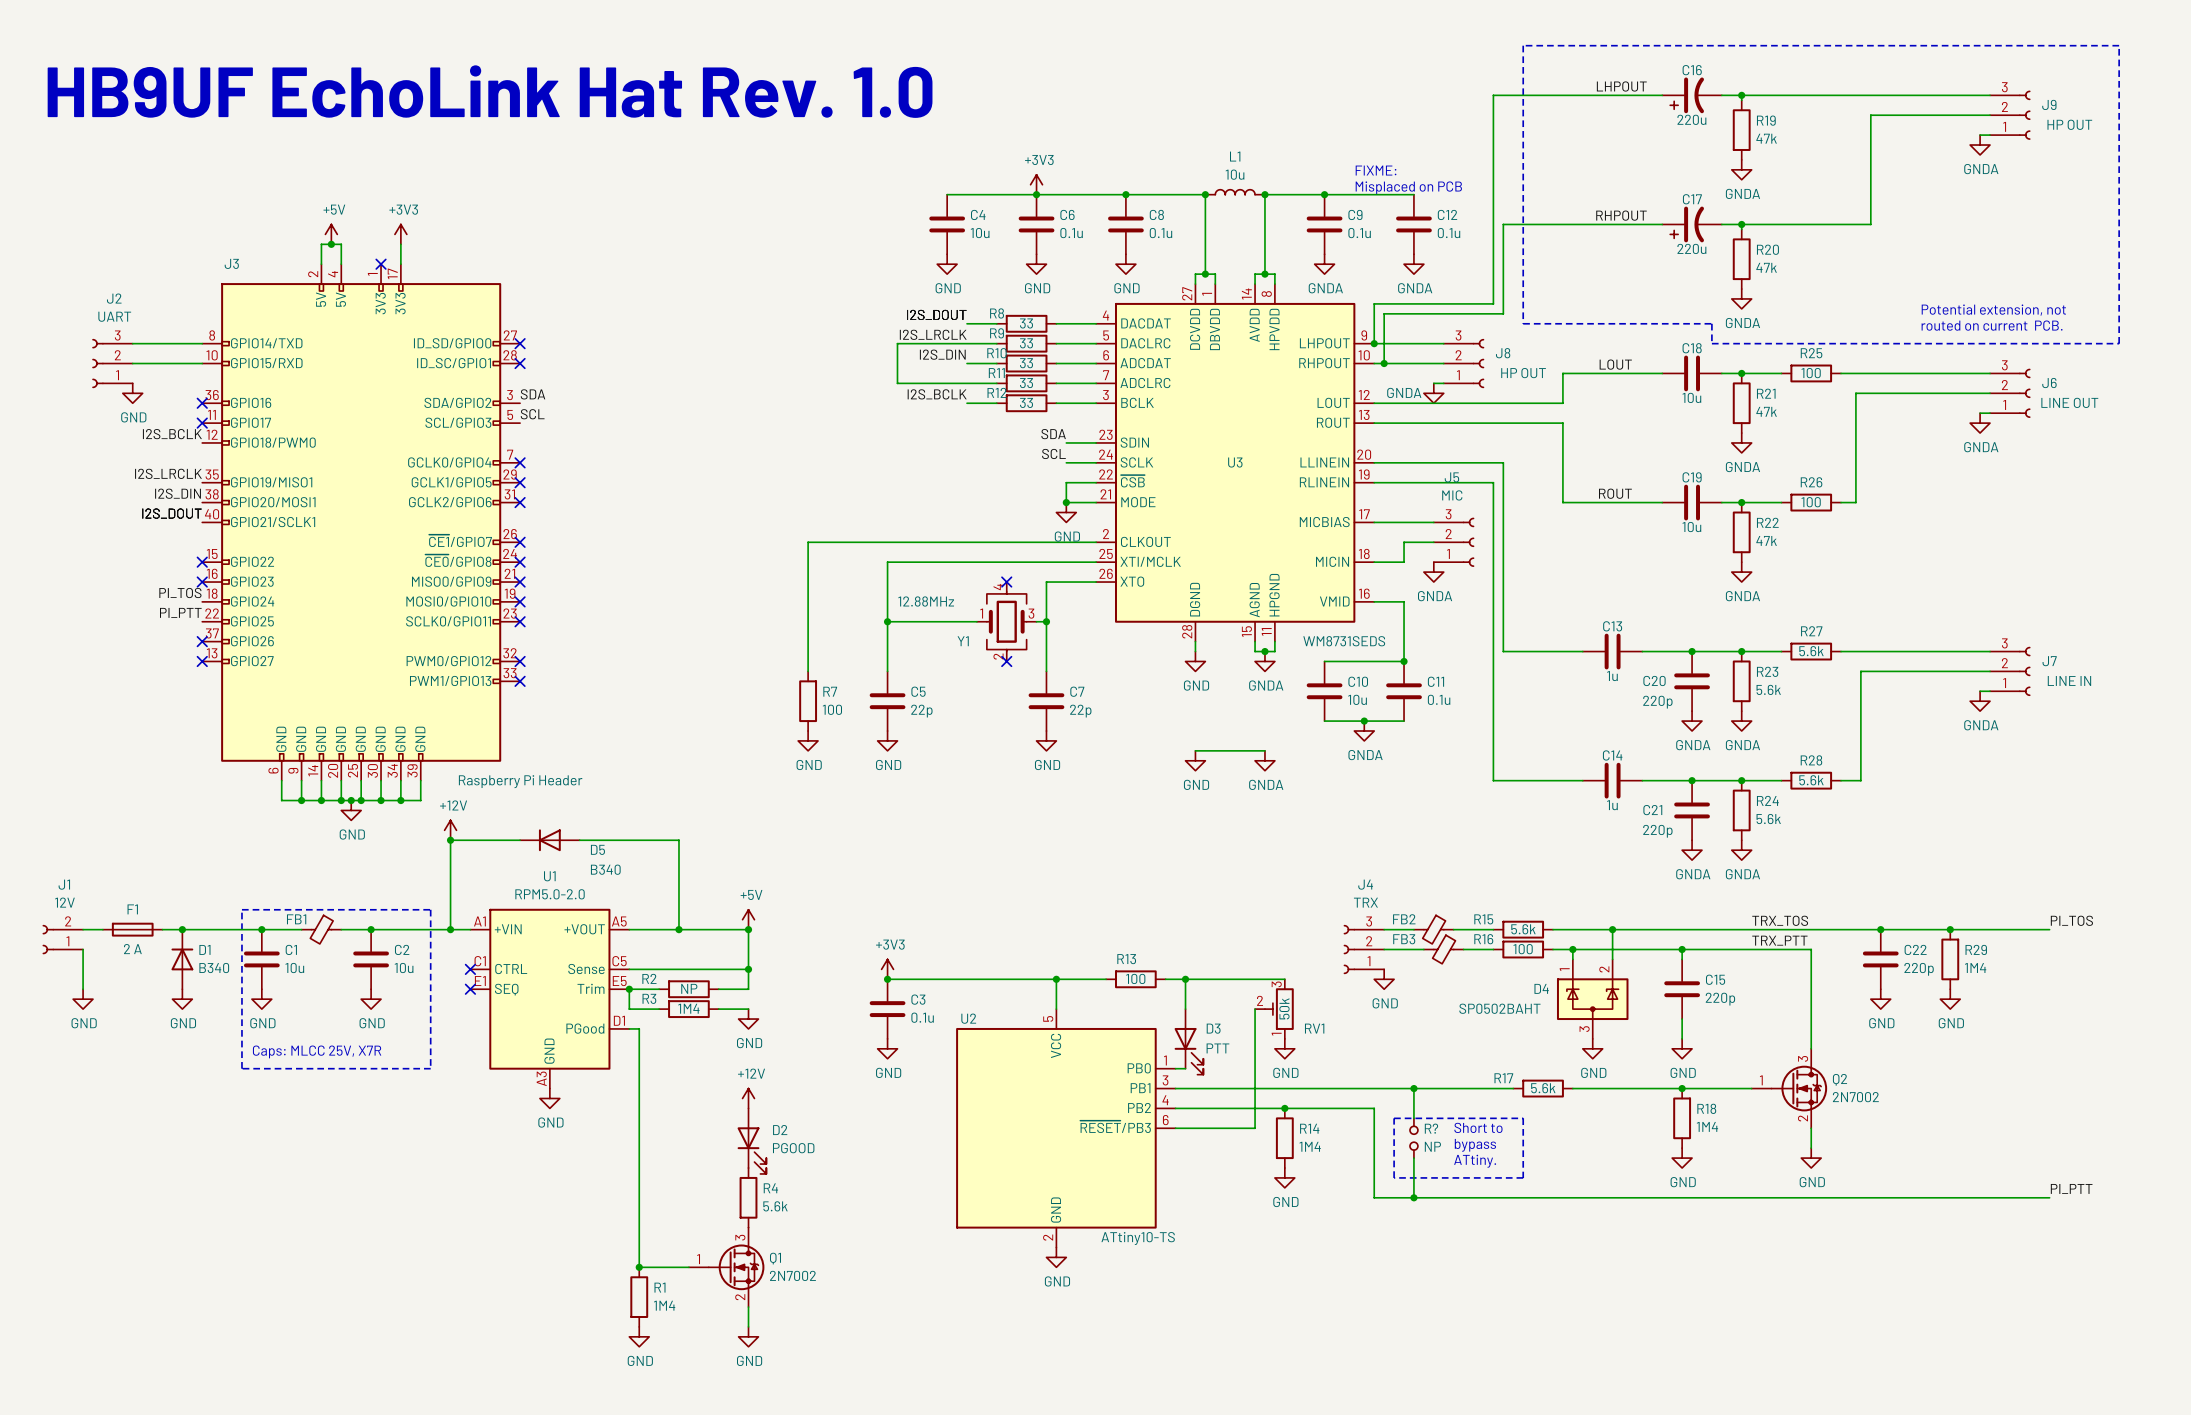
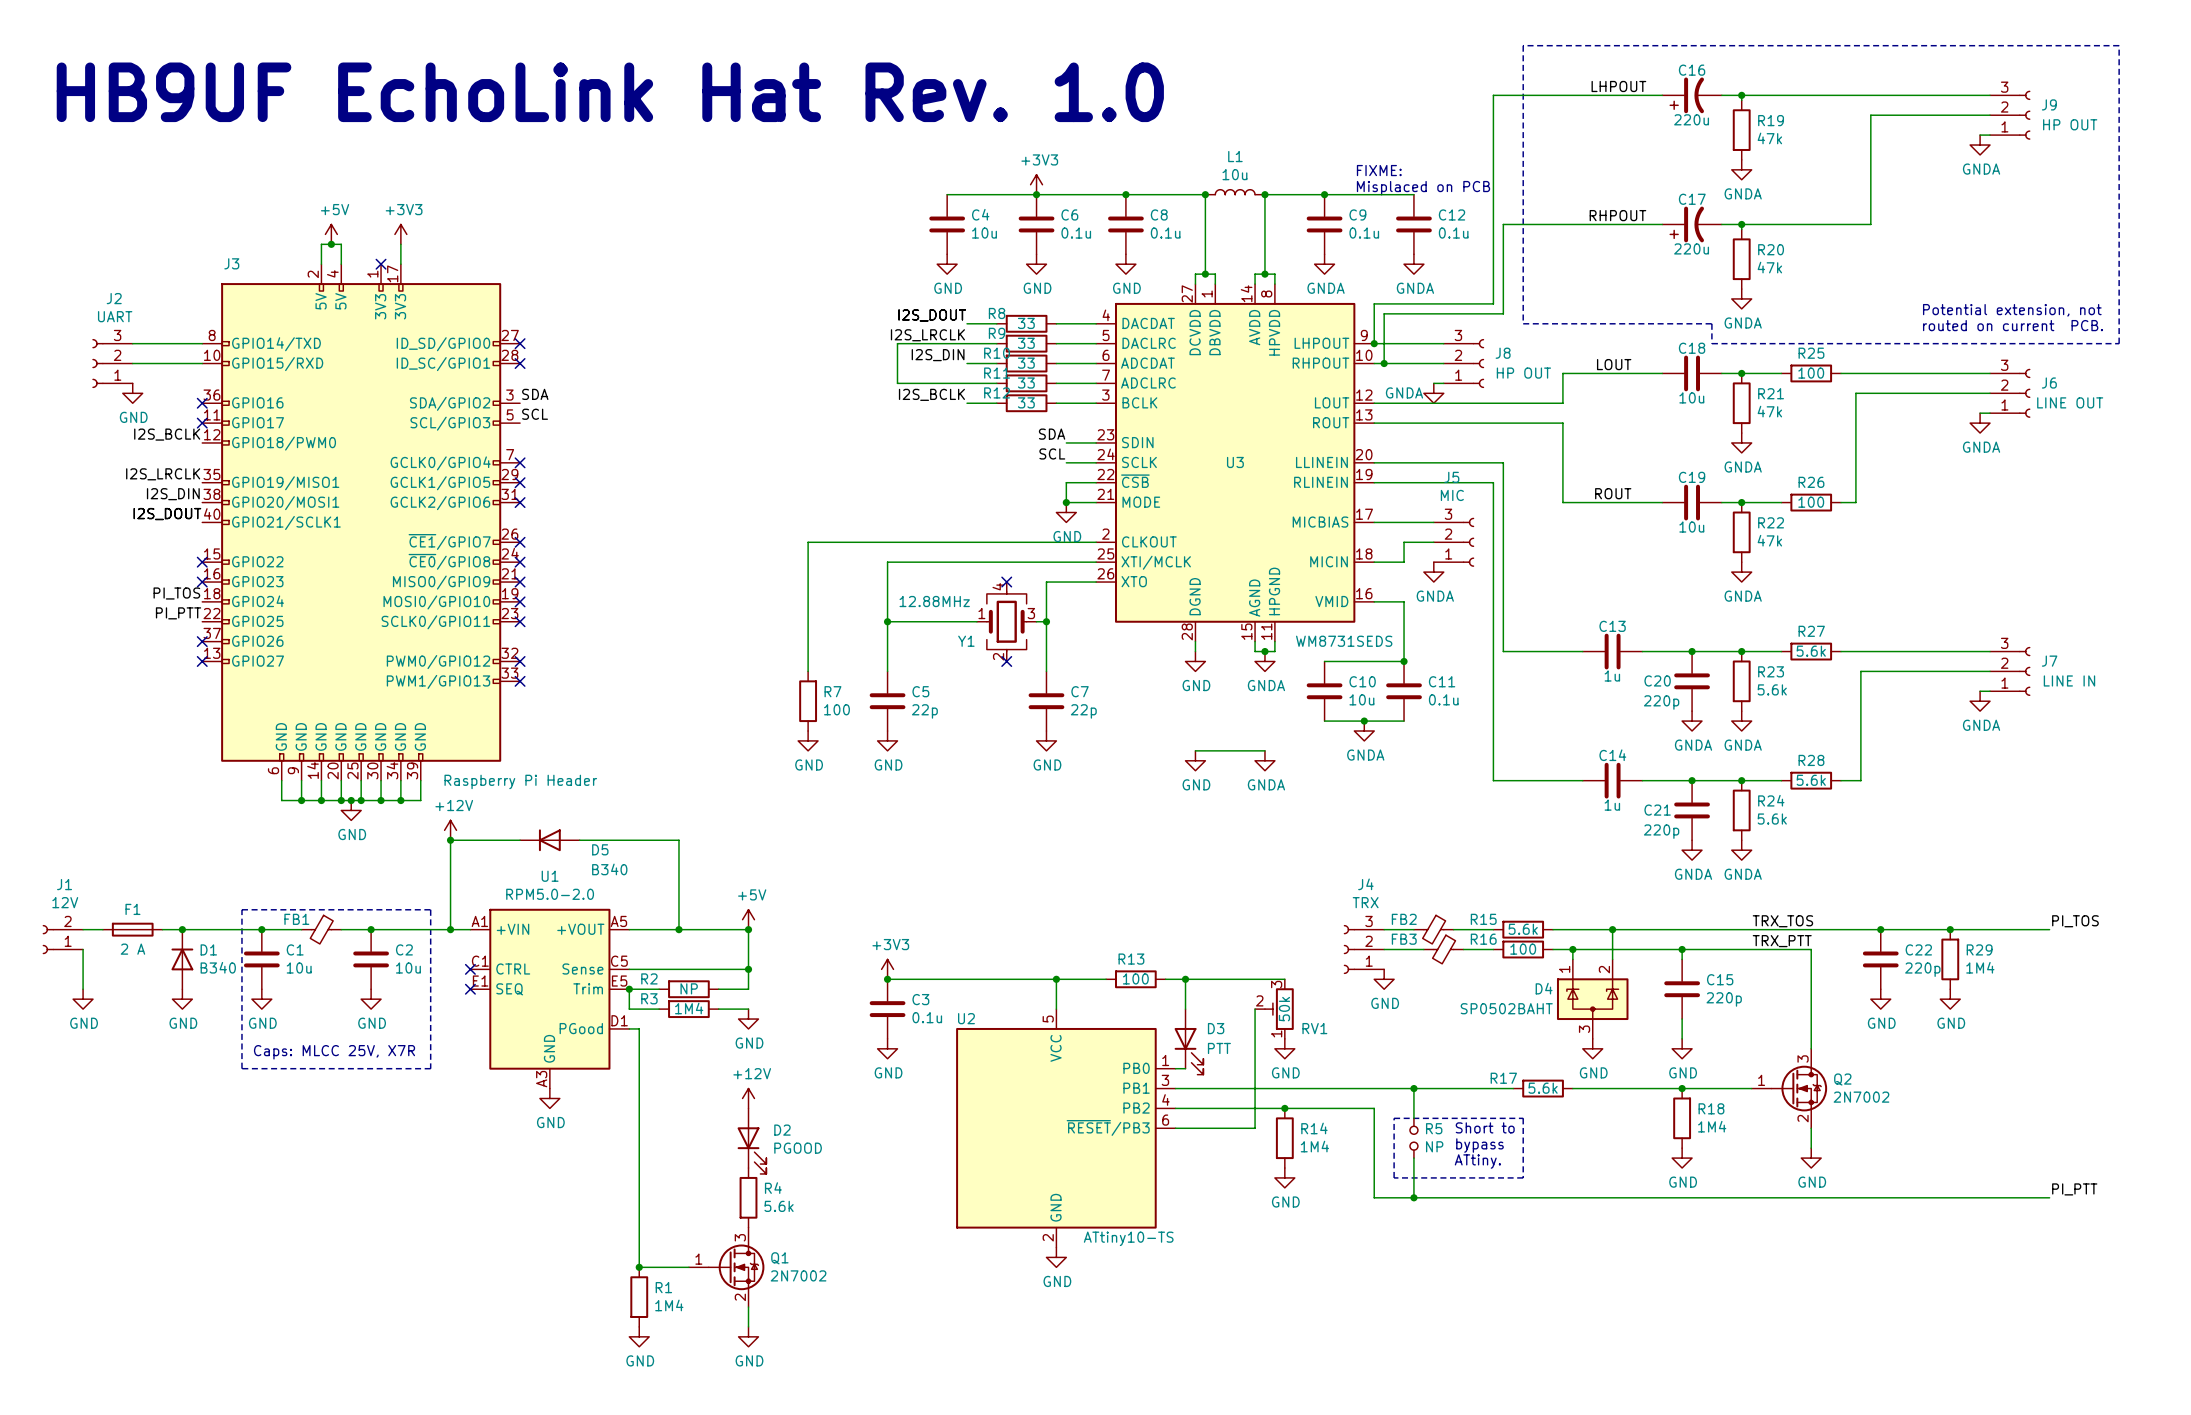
R? name: R? (1431, 1128) -> R5 (1434, 1128)

